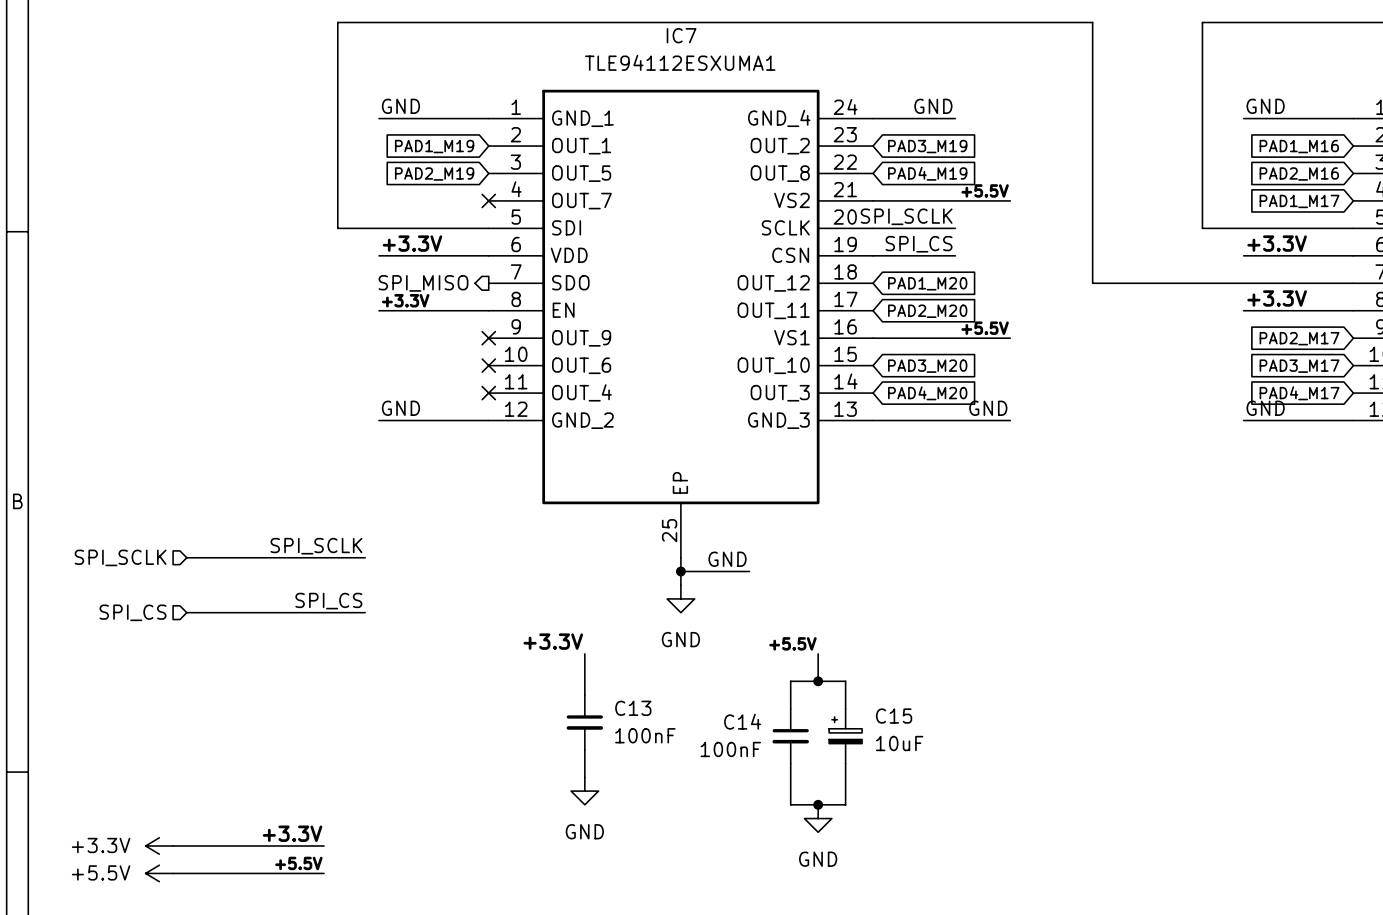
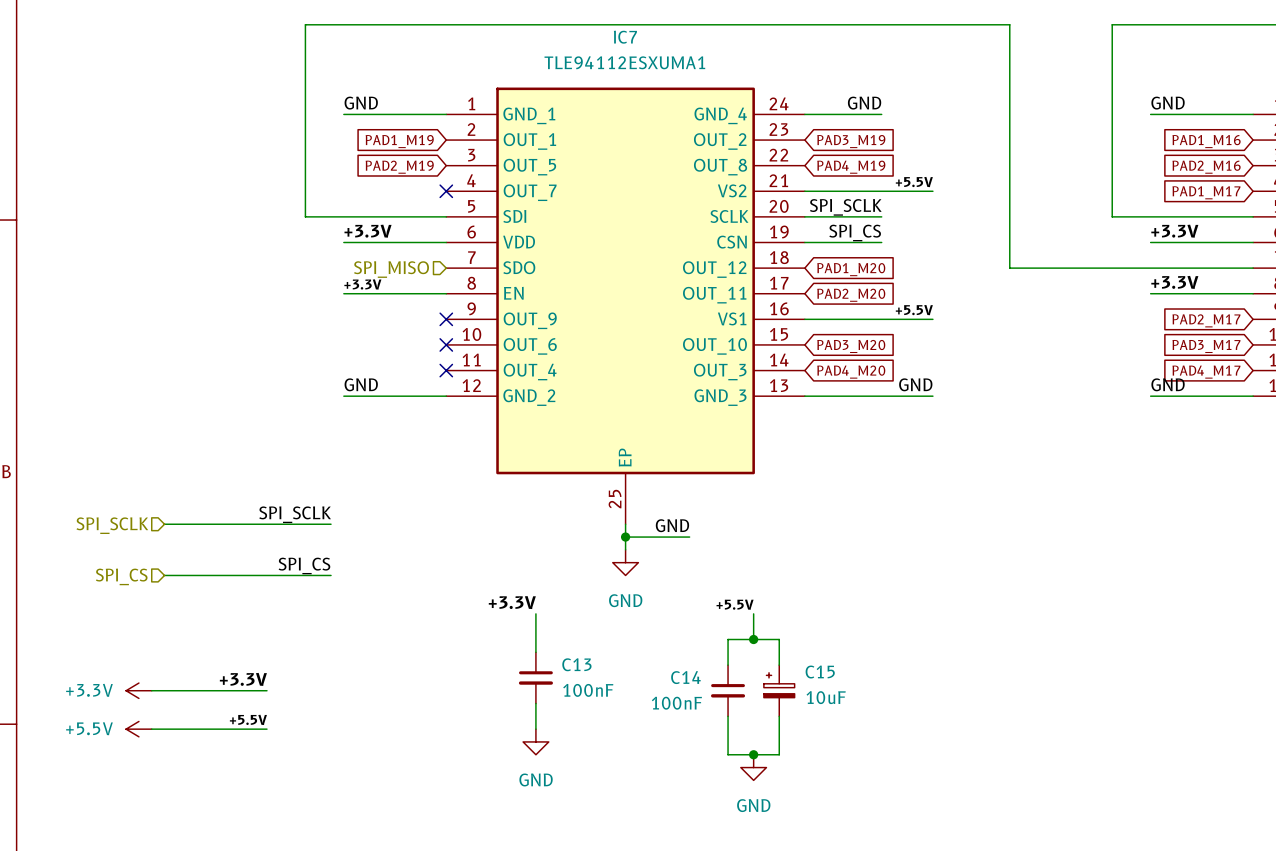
hierarchical label shape: output (423, 283) -> input (391, 269)
wire: none -> (151, 690) (266, 690)
wire: none -> (151, 729) (266, 729)
label position: +3.3V (292, 833) -> +3.3V (243, 679)
power symbol position: +3.3V (159, 846) -> +3.3V (138, 690)
wire: (173, 846) (324, 846) -> none
label position: +5.5V (298, 863) -> +5.5V (248, 719)
power symbol position: +5.5V (159, 873) -> +5.5V (138, 729)
wire: (173, 873) (324, 873) -> none

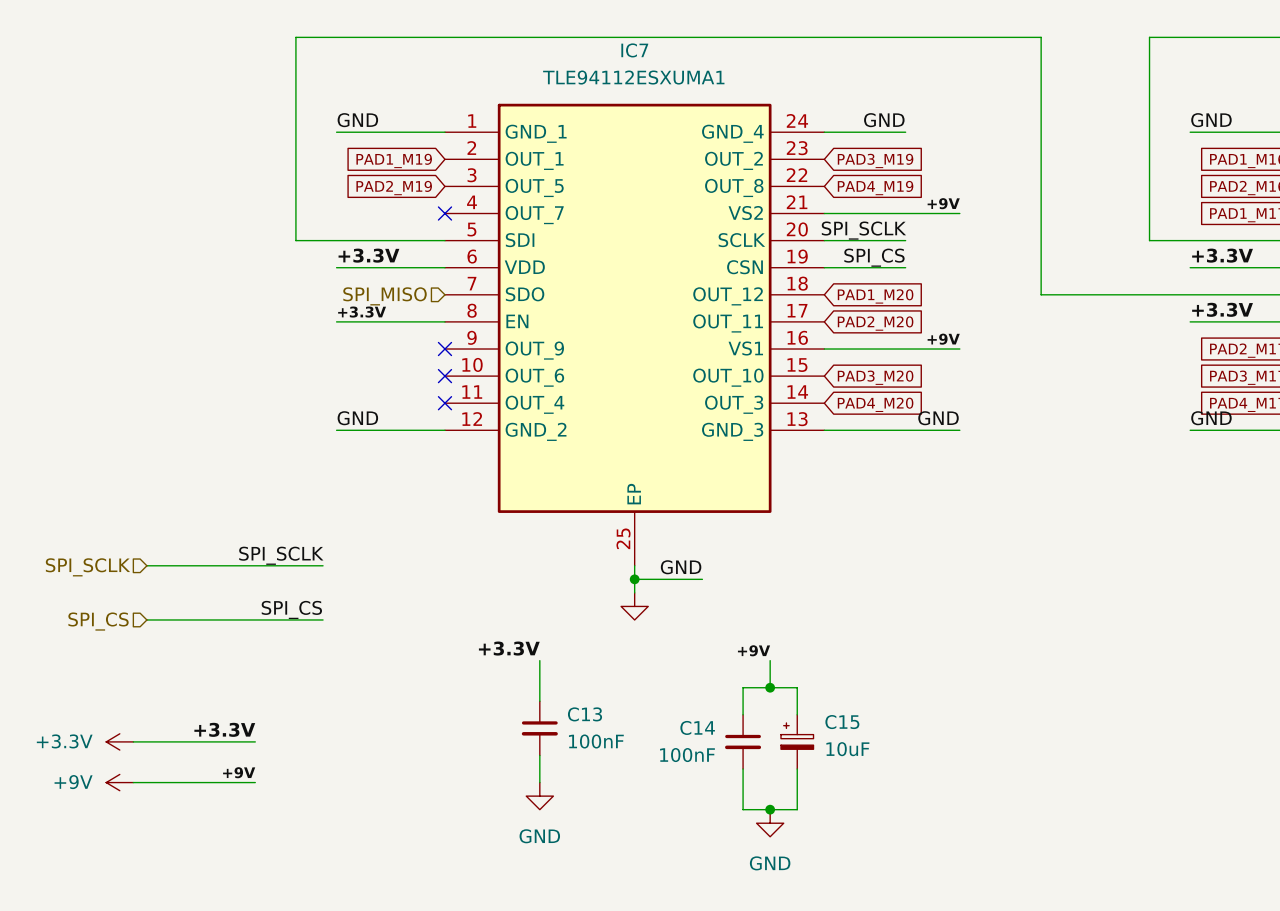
label: +5.5V (914, 182) -> +9V (943, 203)
label: +5.5V (914, 310) -> +9V (943, 339)
power symbol text: GND (625, 600) -> none
label: +5.5V (735, 604) -> +9V (754, 650)
label: +5.5V (248, 719) -> +9V (239, 772)
power symbol: +5.5V (138, 729) -> +9V (119, 782)

